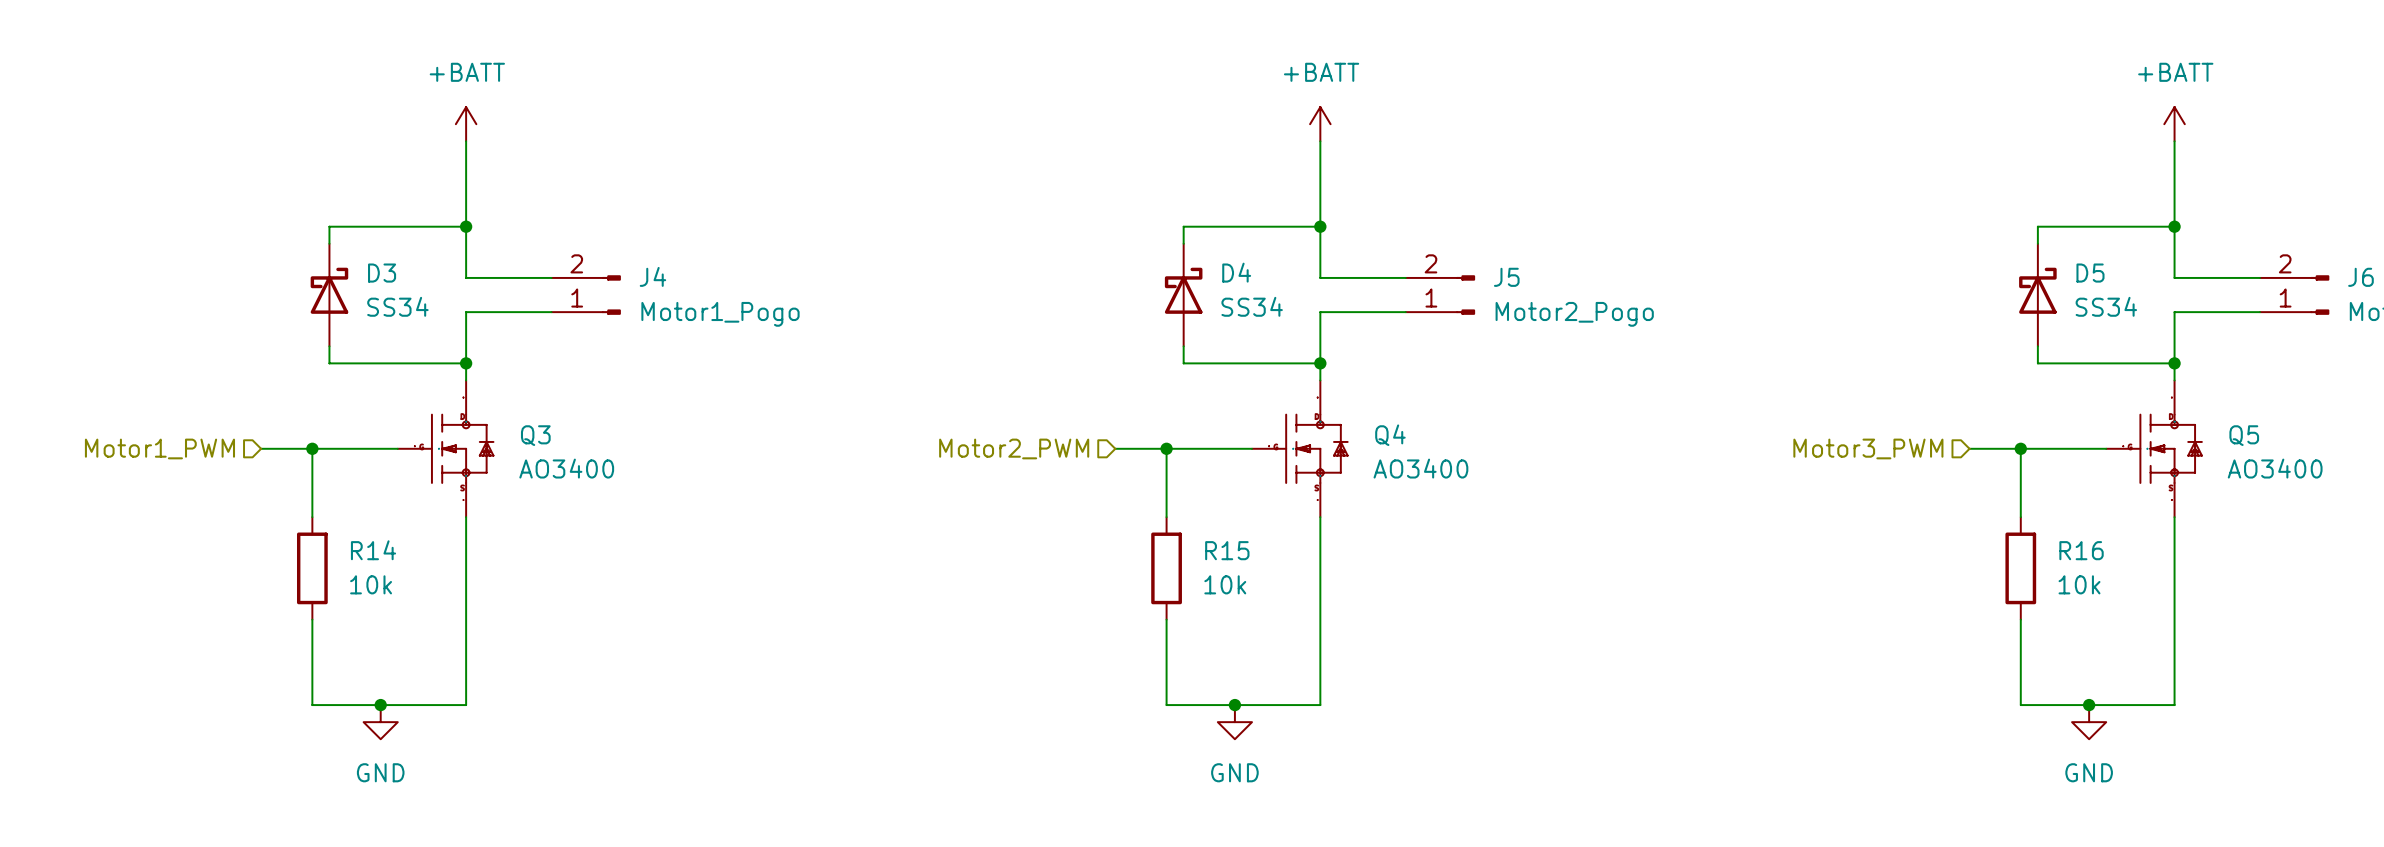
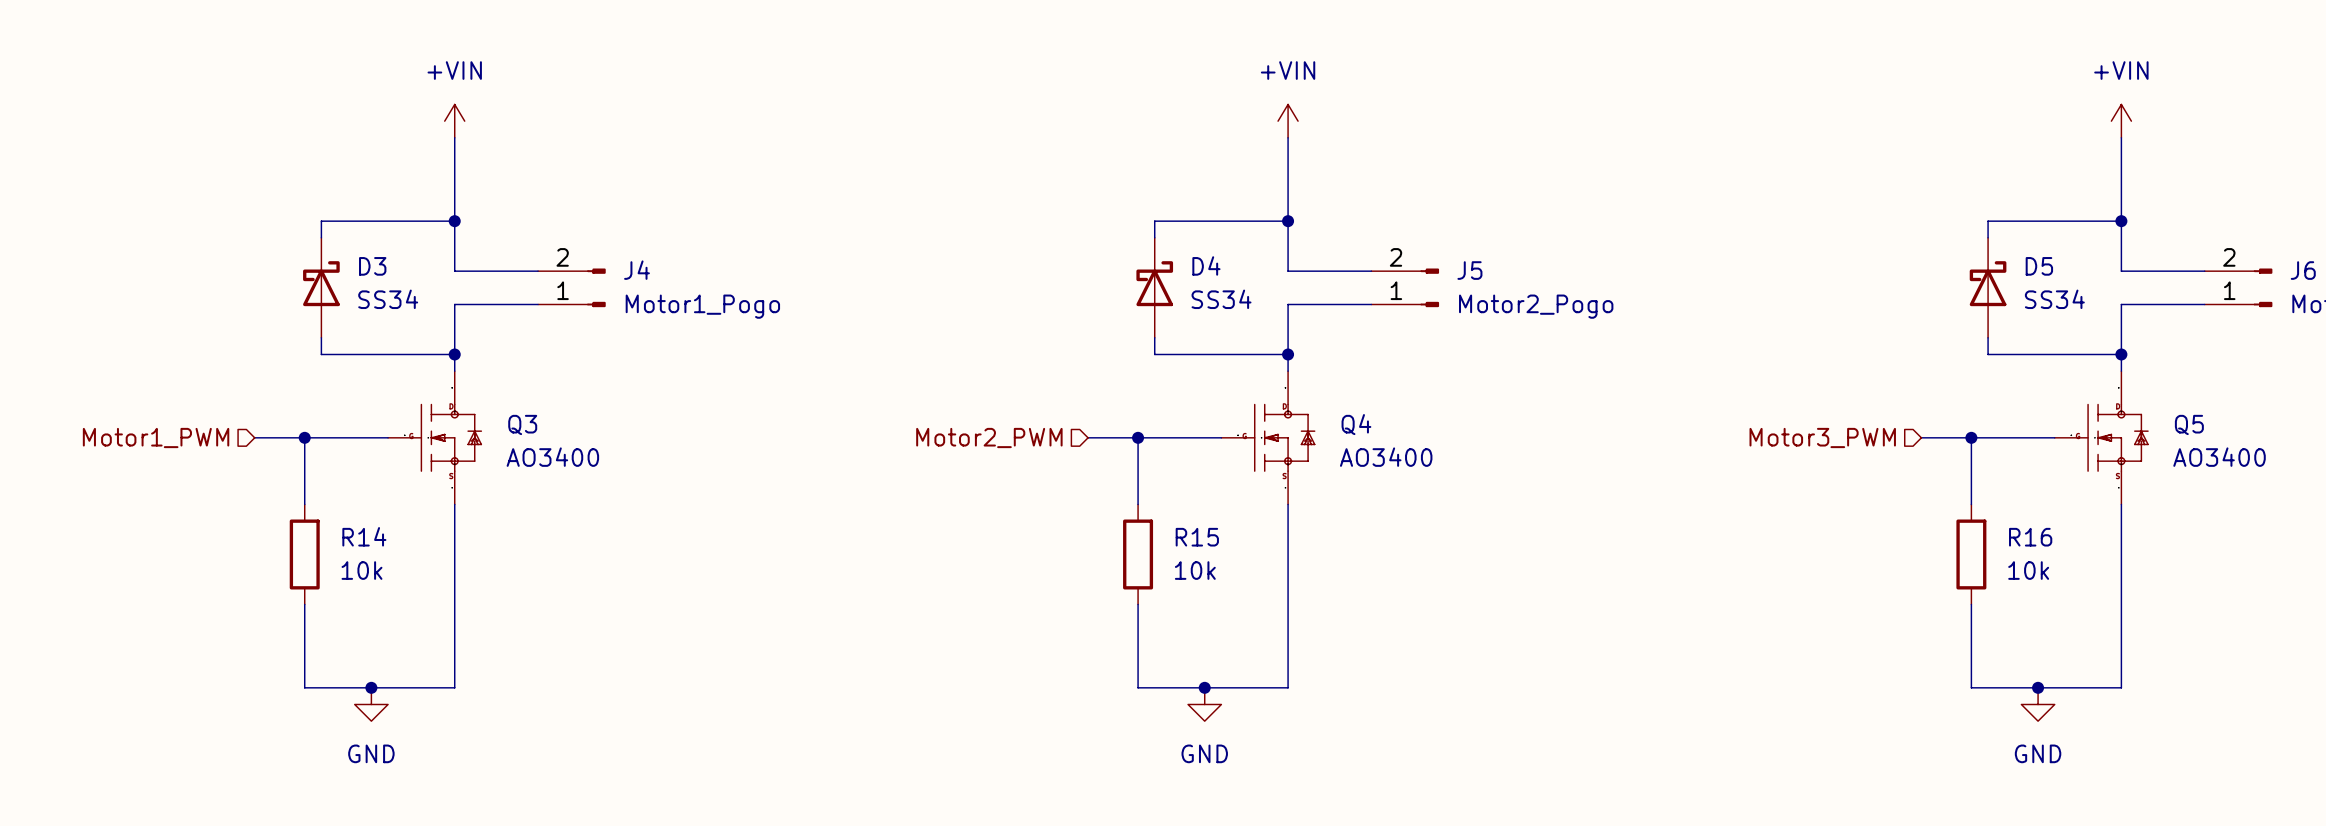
power symbol: +BATT (466, 124) -> +VIN (454, 121)
power symbol: +BATT (1320, 124) -> +VIN (1288, 121)
power symbol: +BATT (2174, 124) -> +VIN (2121, 121)

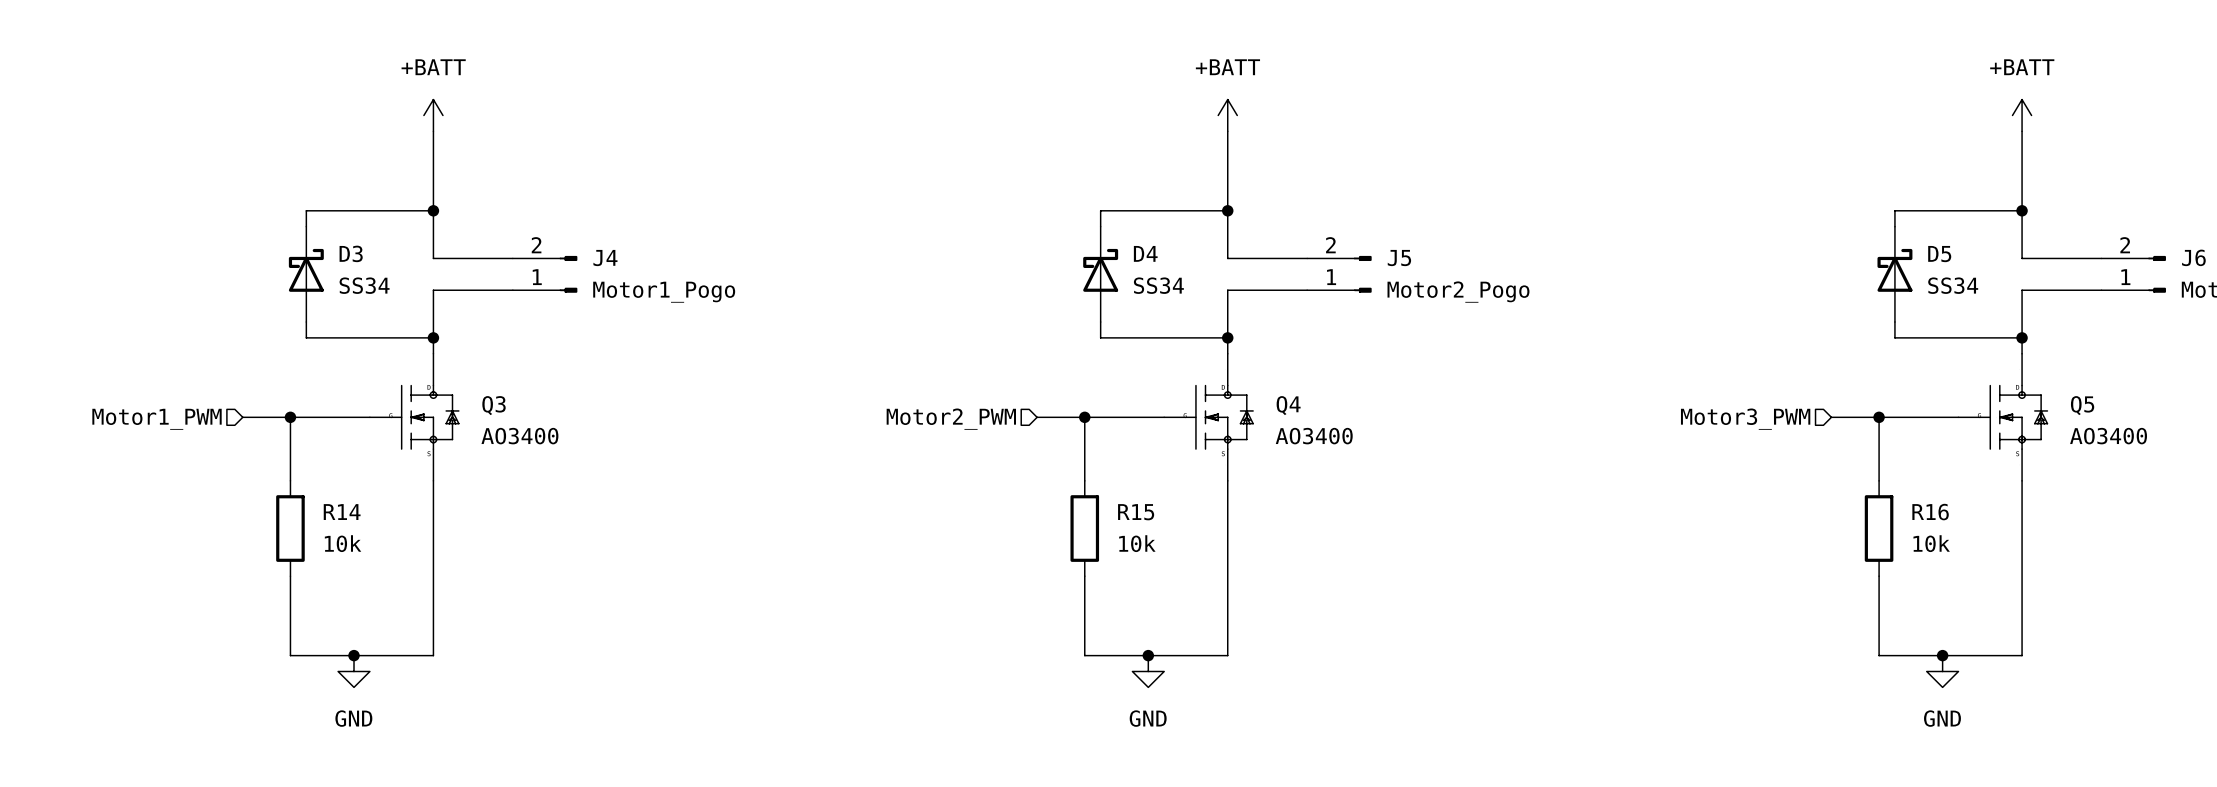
power symbol: +VIN (454, 121) -> +BATT (433, 115)
power symbol: +VIN (1288, 121) -> +BATT (1227, 115)
power symbol: +VIN (2121, 121) -> +BATT (2022, 115)

